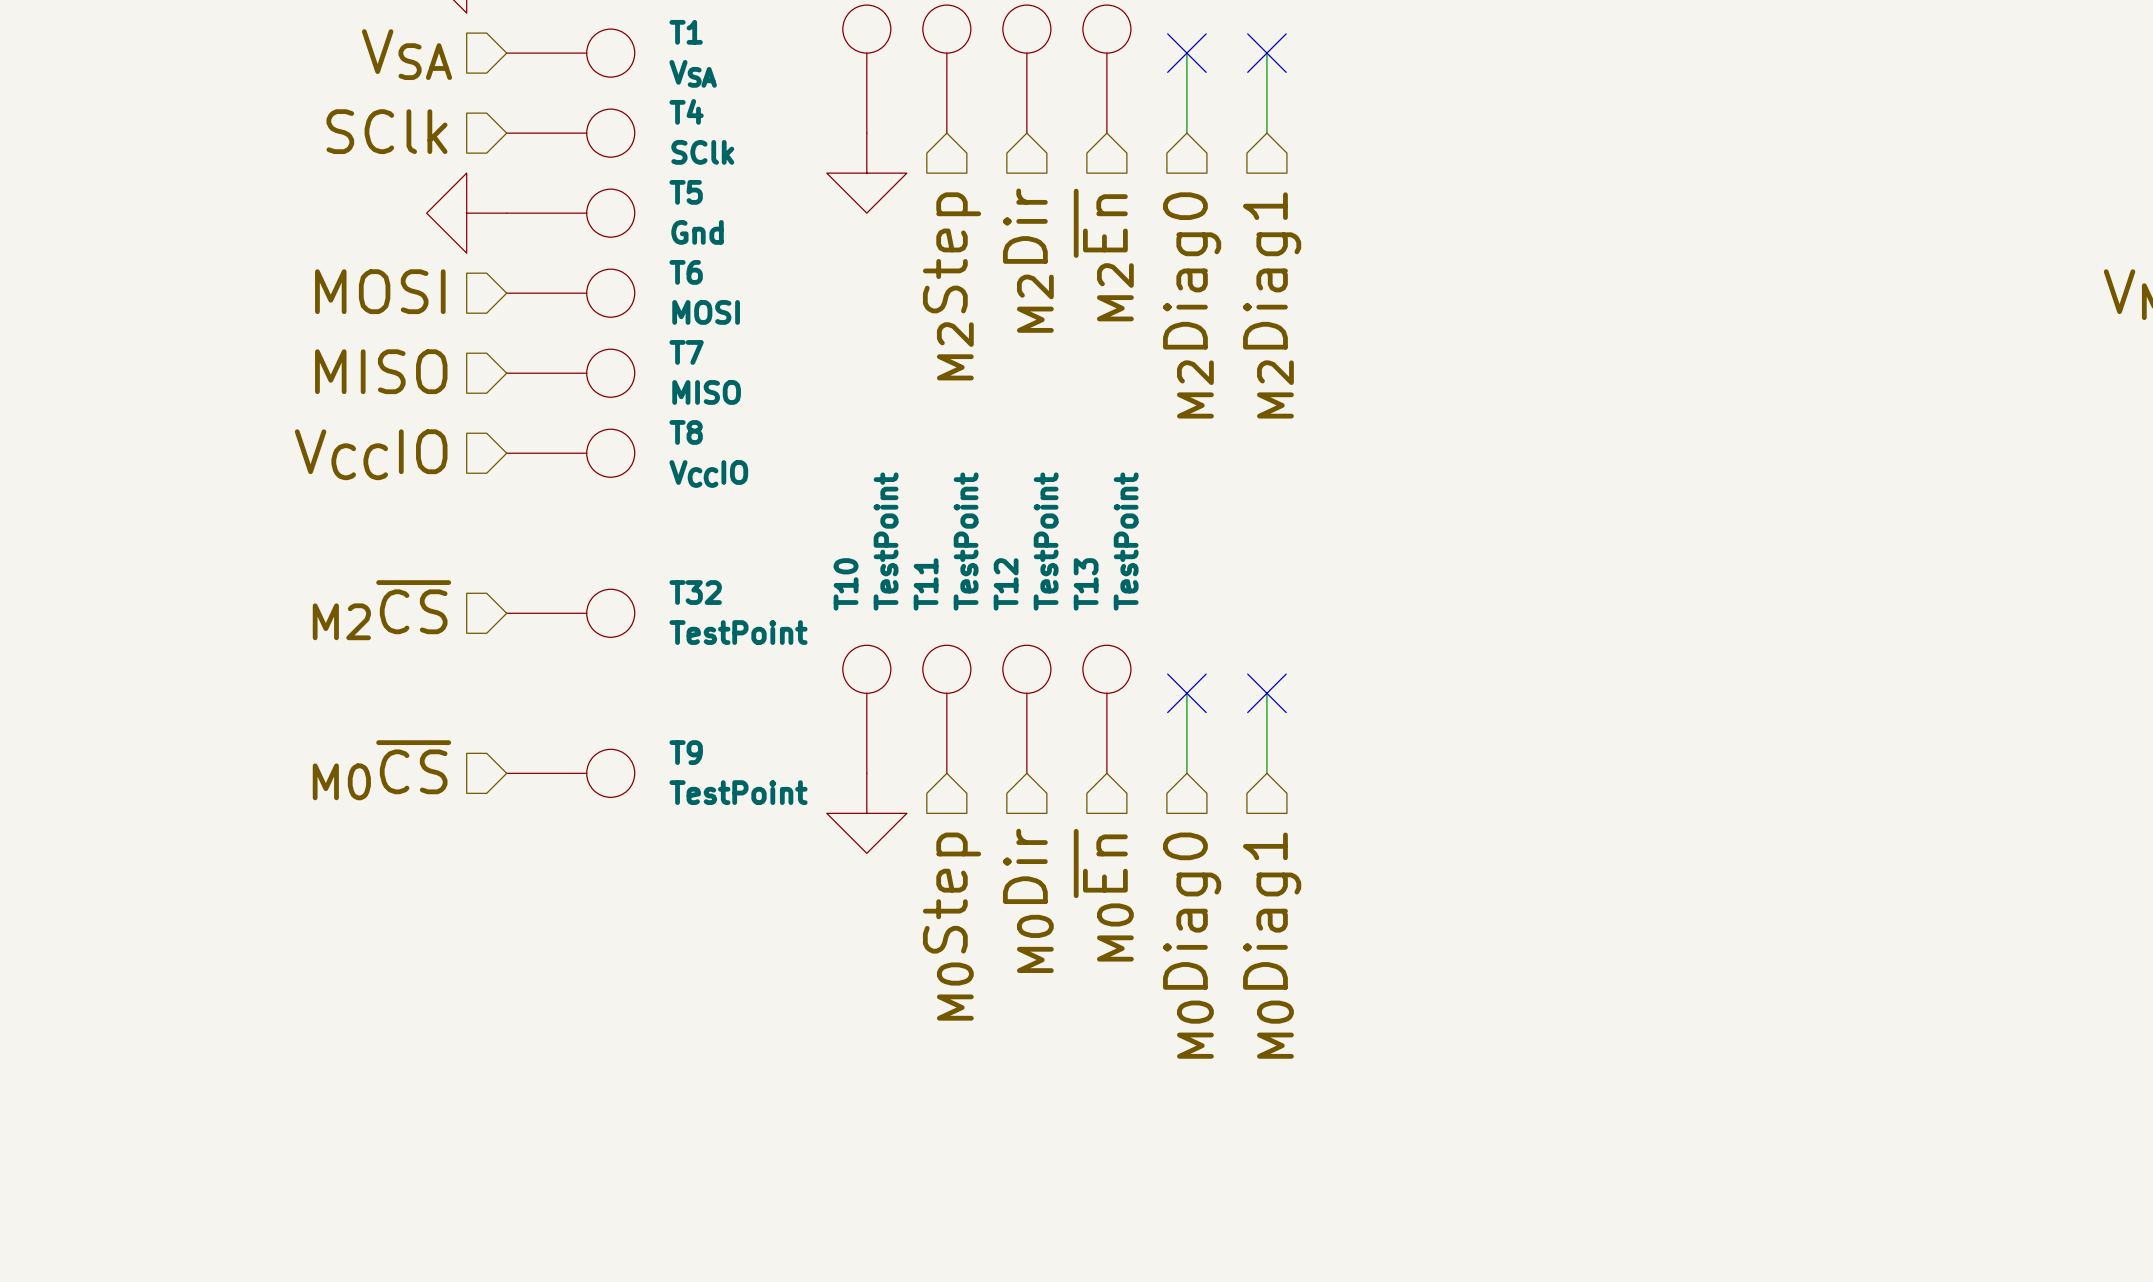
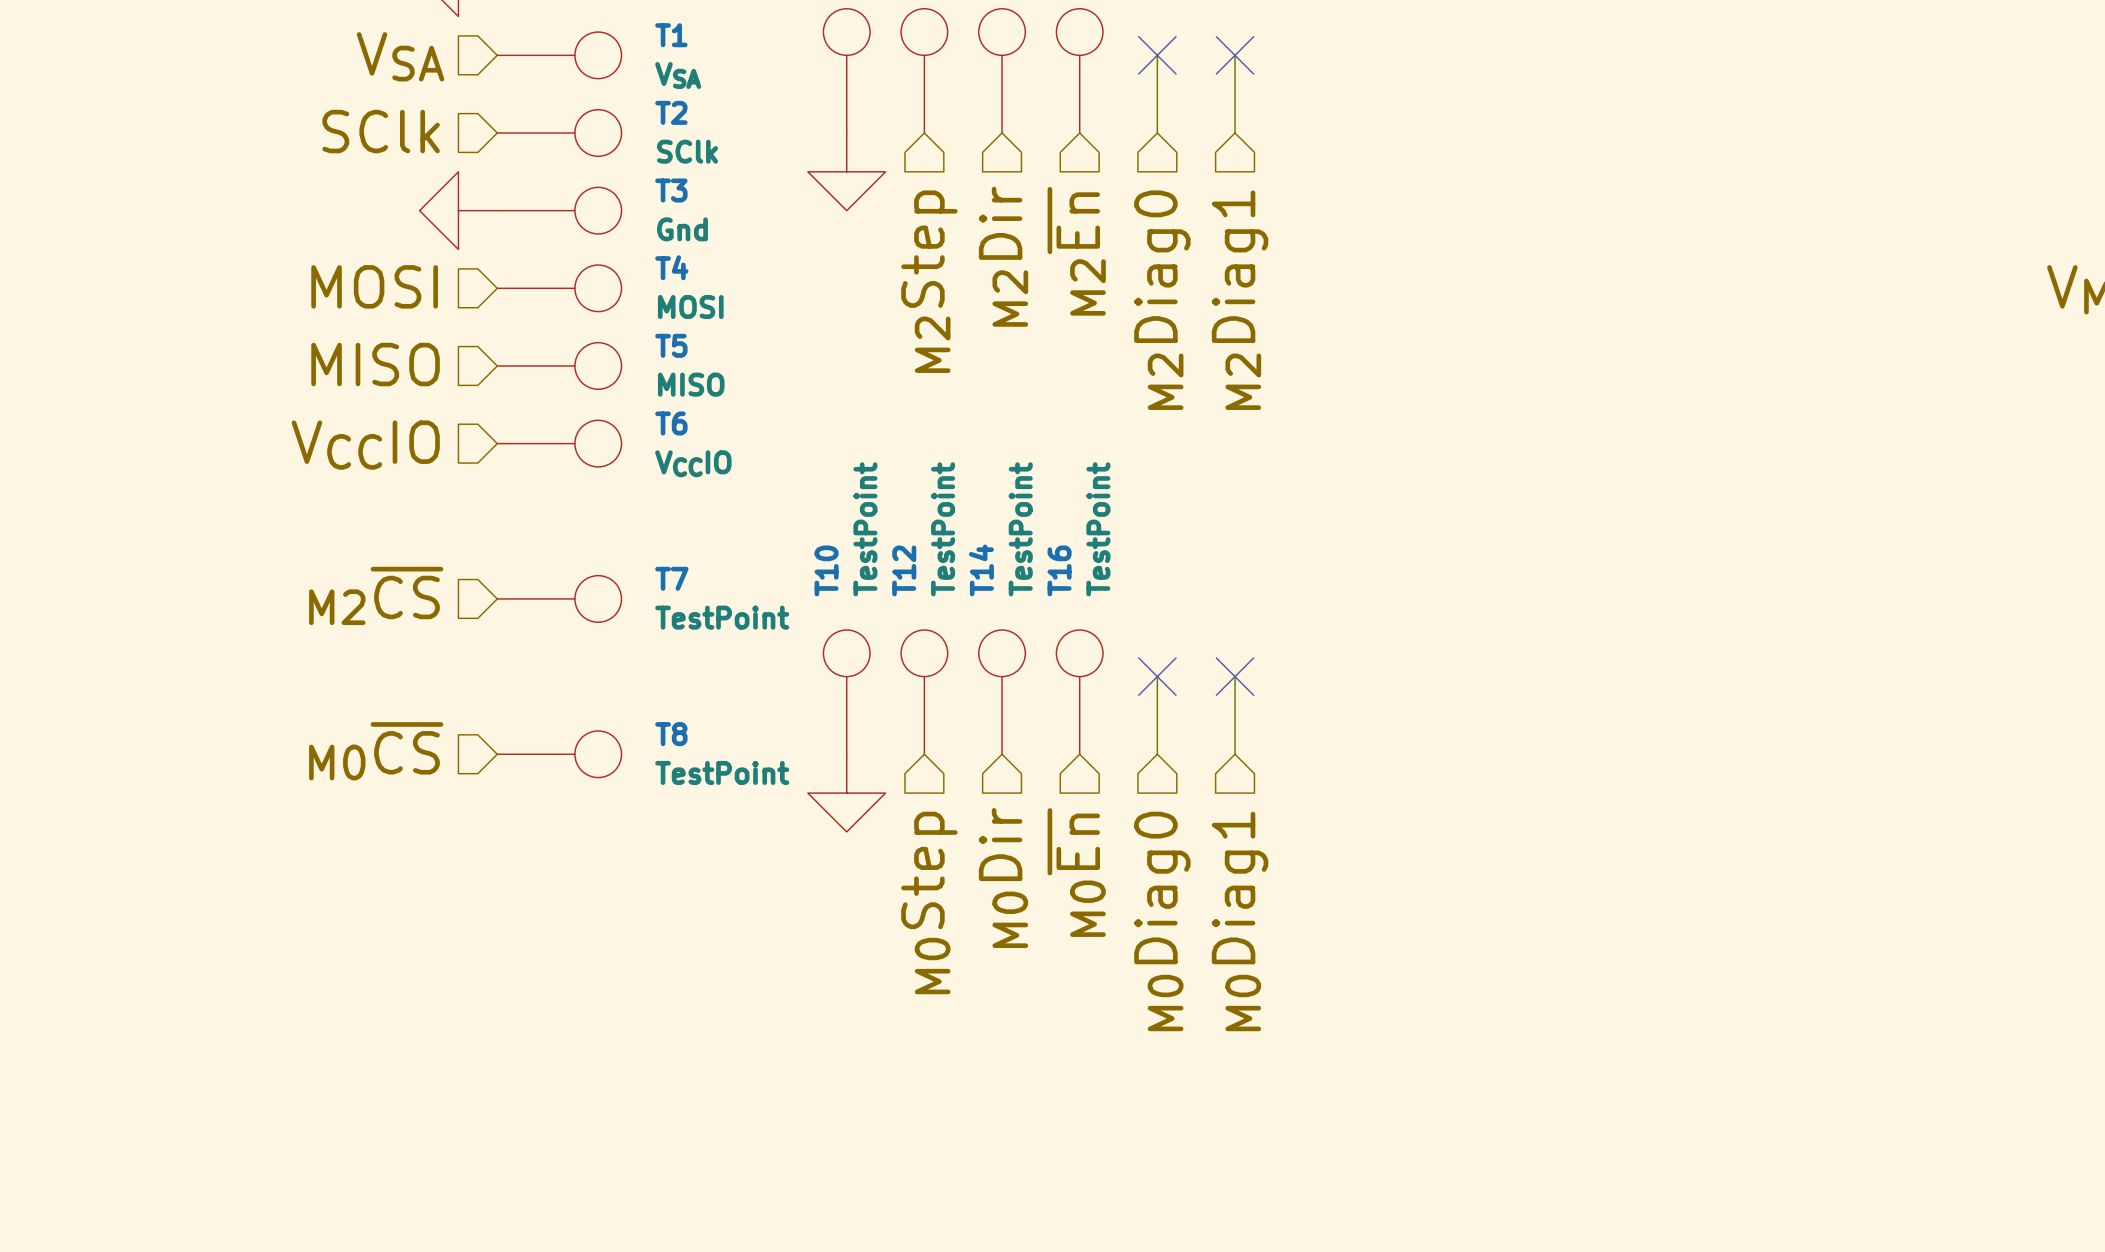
T4 name: T4 (686, 111) -> T2 (671, 112)
T5 name: T5 (686, 192) -> T3 (671, 190)
T6 name: T6 (686, 272) -> T4 (671, 267)
T7 name: T7 (686, 352) -> T5 (671, 345)
T8 name: T8 (686, 432) -> T6 (671, 423)
T11 name: T11 (926, 584) -> T12 (904, 570)
T12 name: T12 (1006, 584) -> T14 (981, 570)
T13 name: T13 (1086, 584) -> T16 (1059, 570)
T32 name: T32 (695, 592) -> T7 (671, 578)
T9 name: T9 (686, 752) -> T8 (671, 734)

